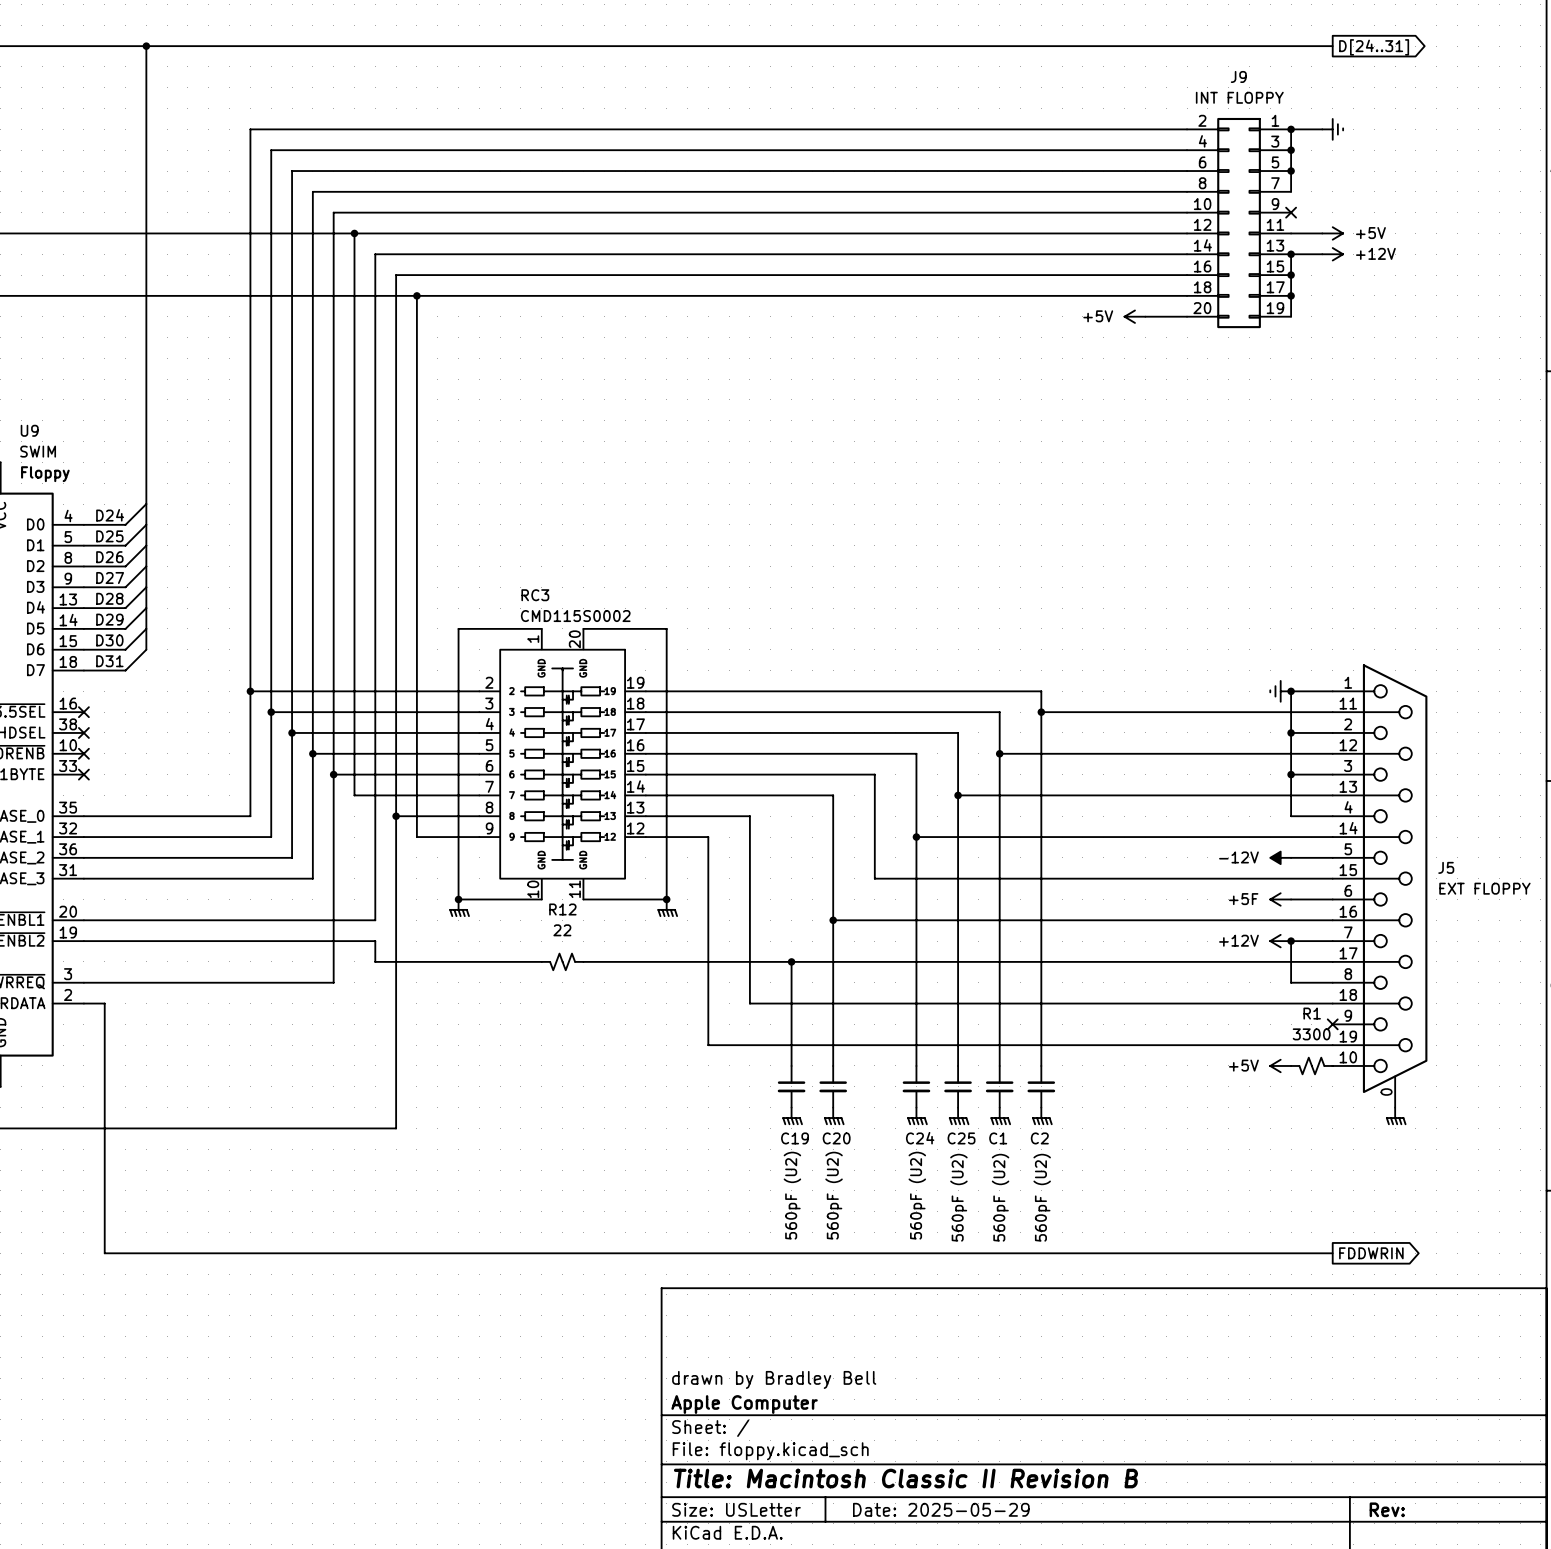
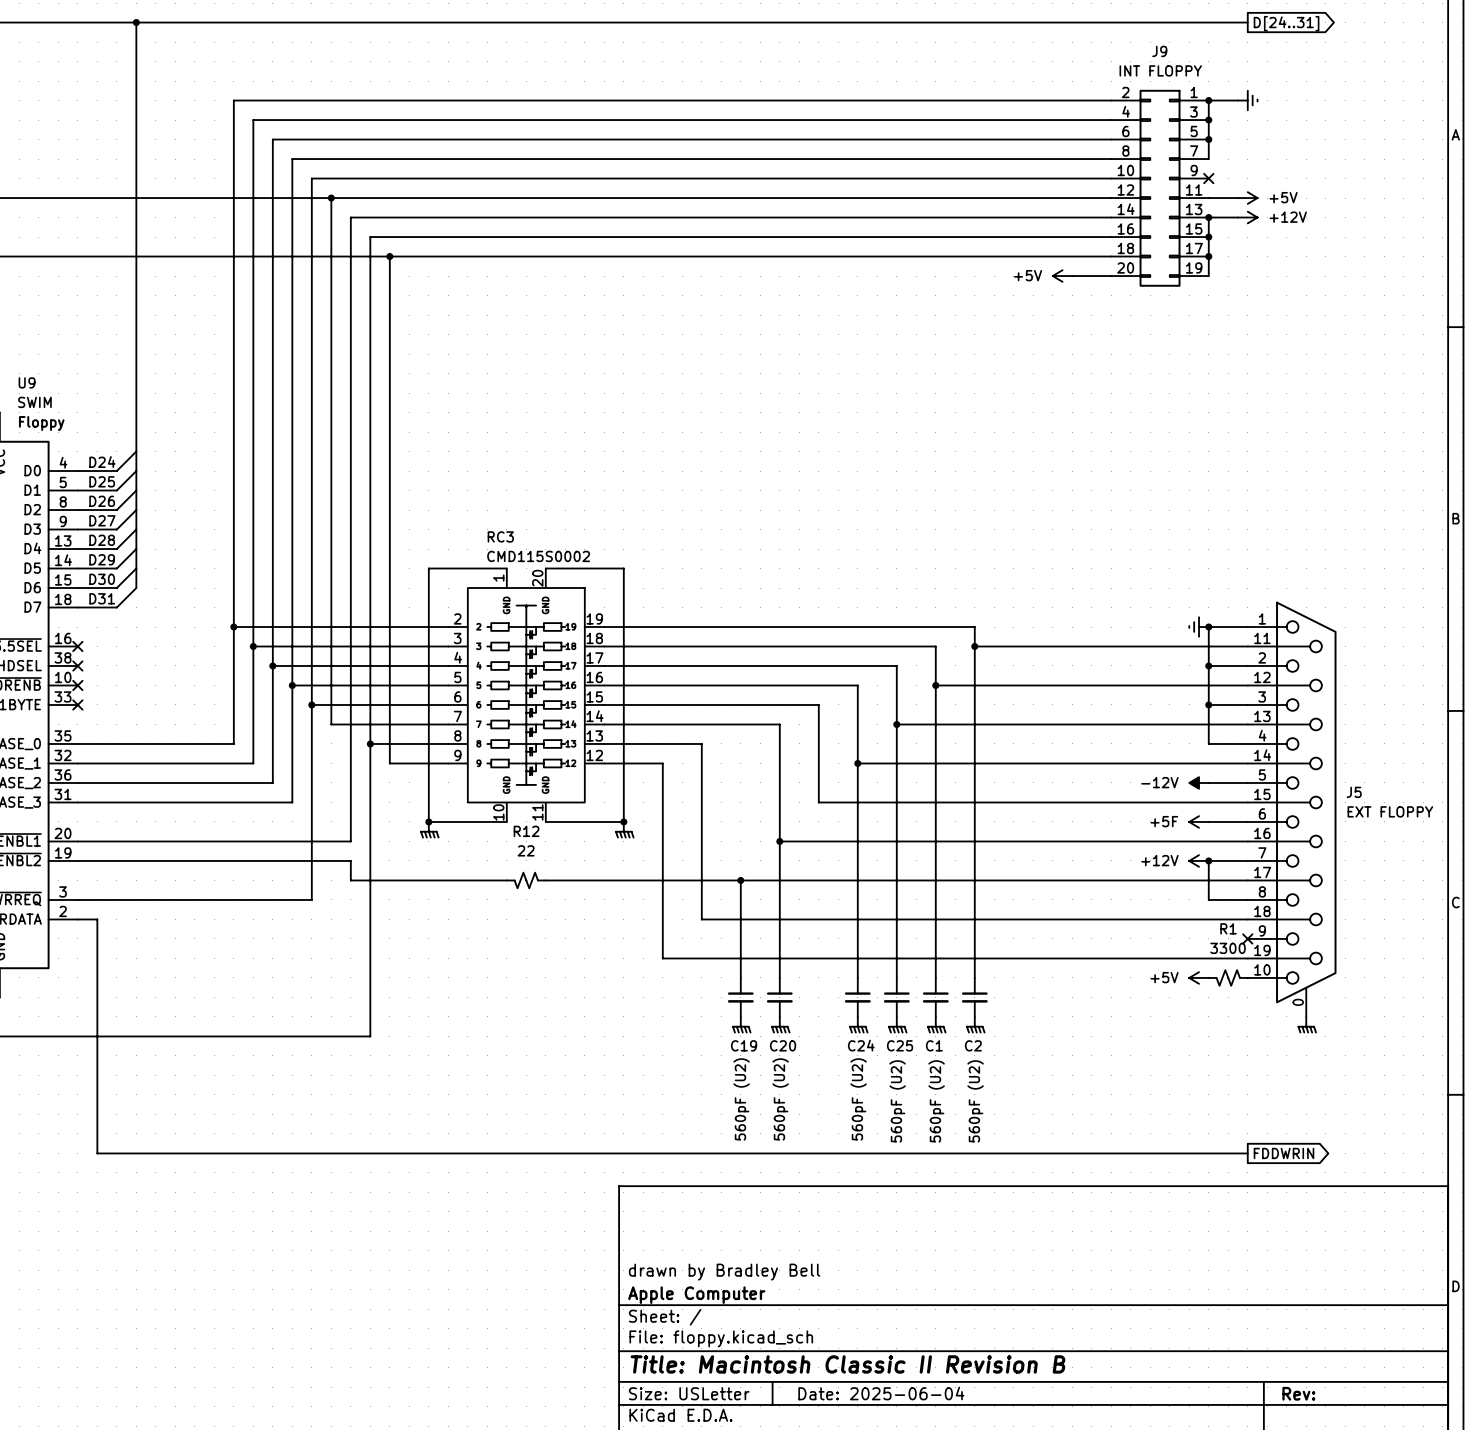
title block: Date: 2025-05-29 (941, 1509) -> Date: 2025-06-04 (881, 1393)

